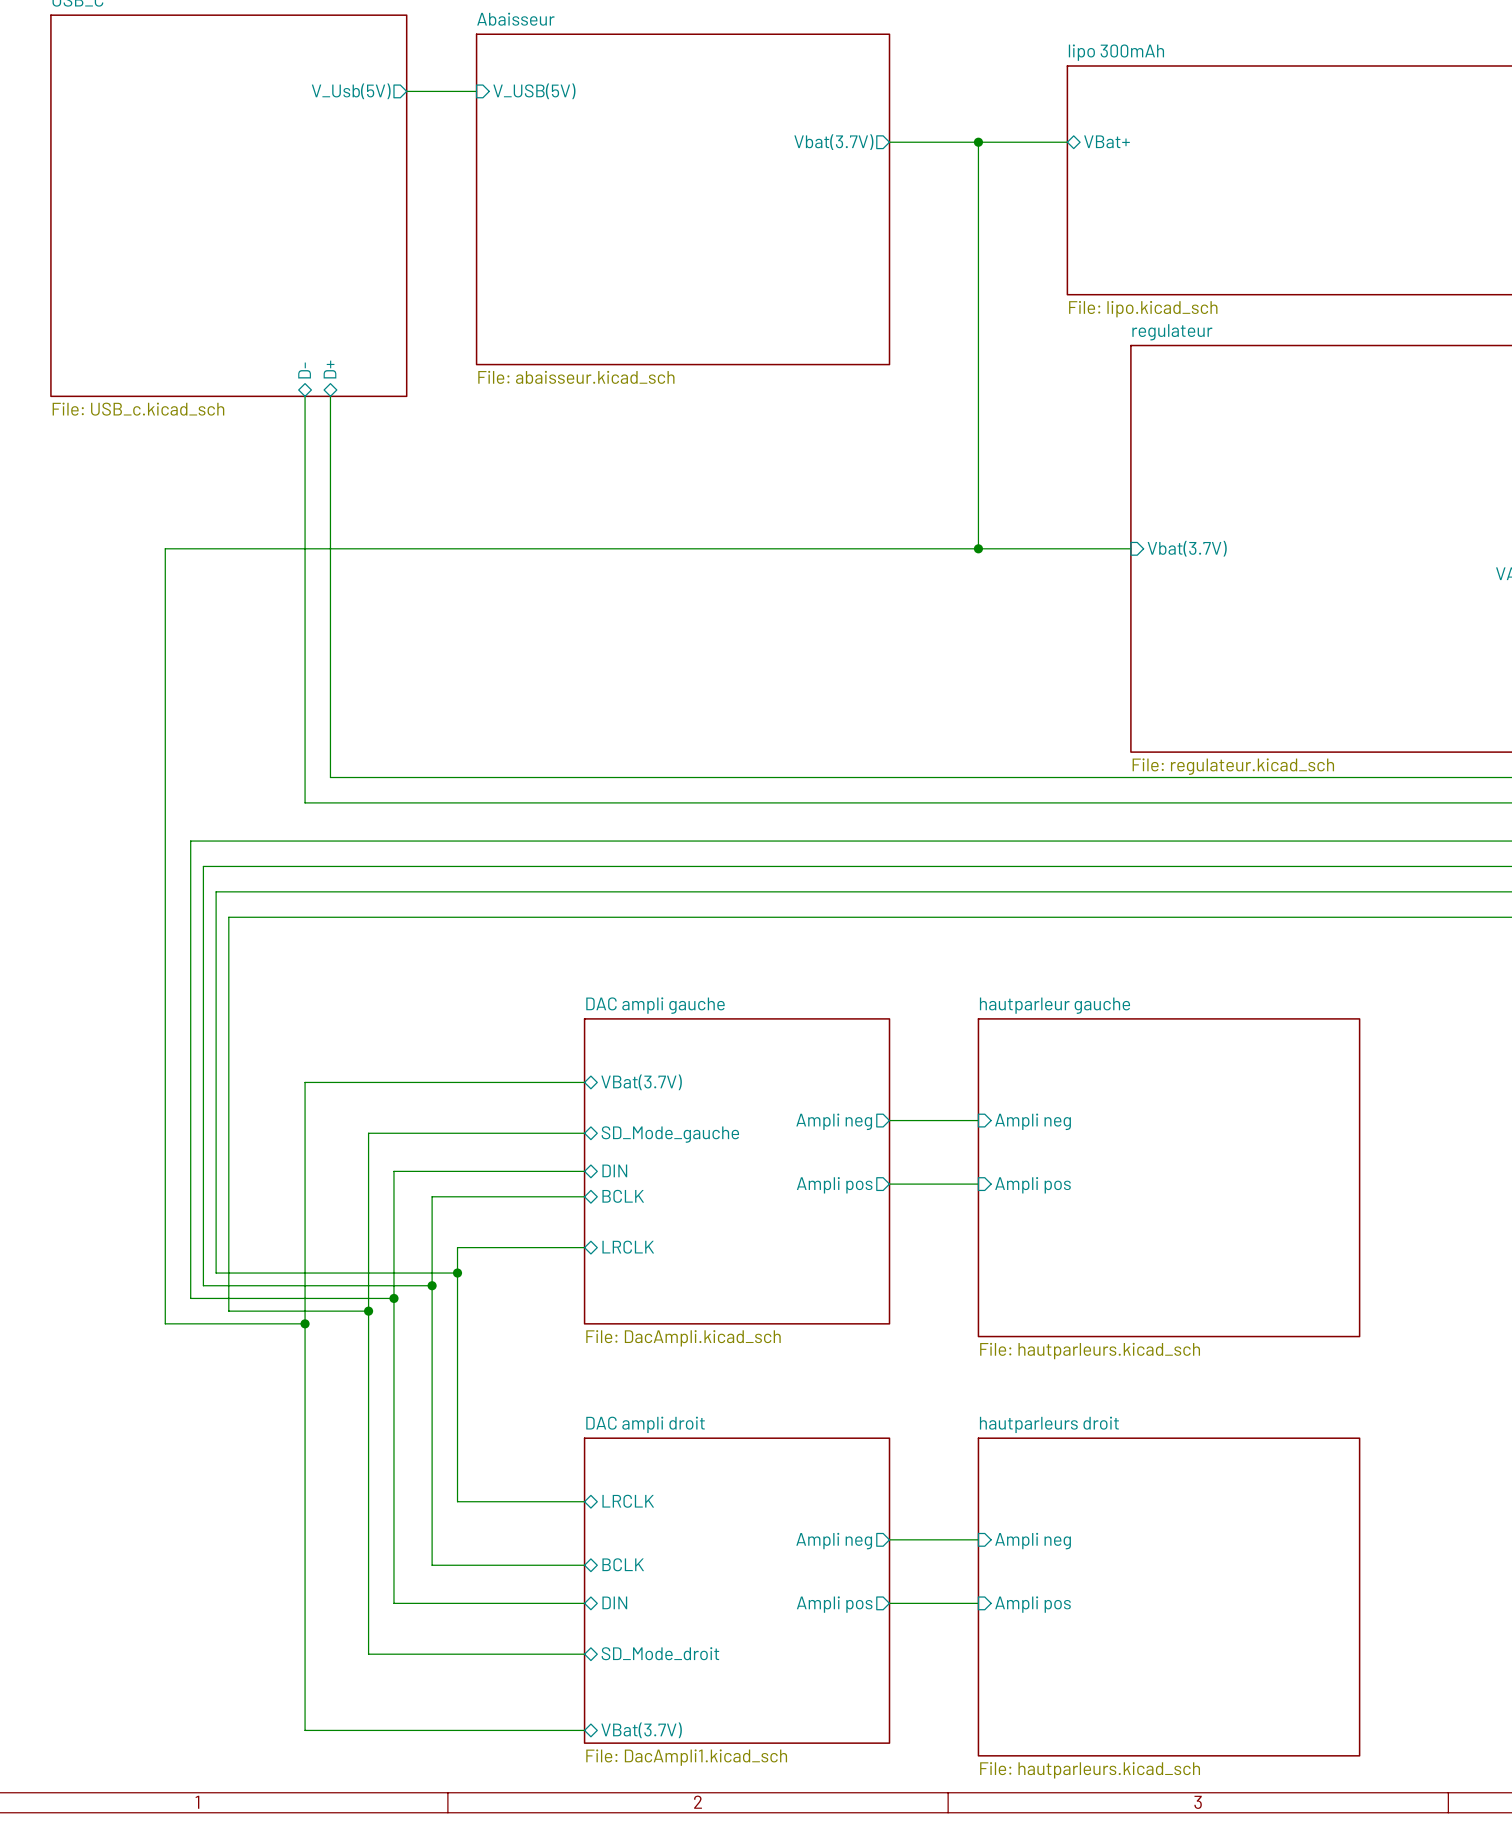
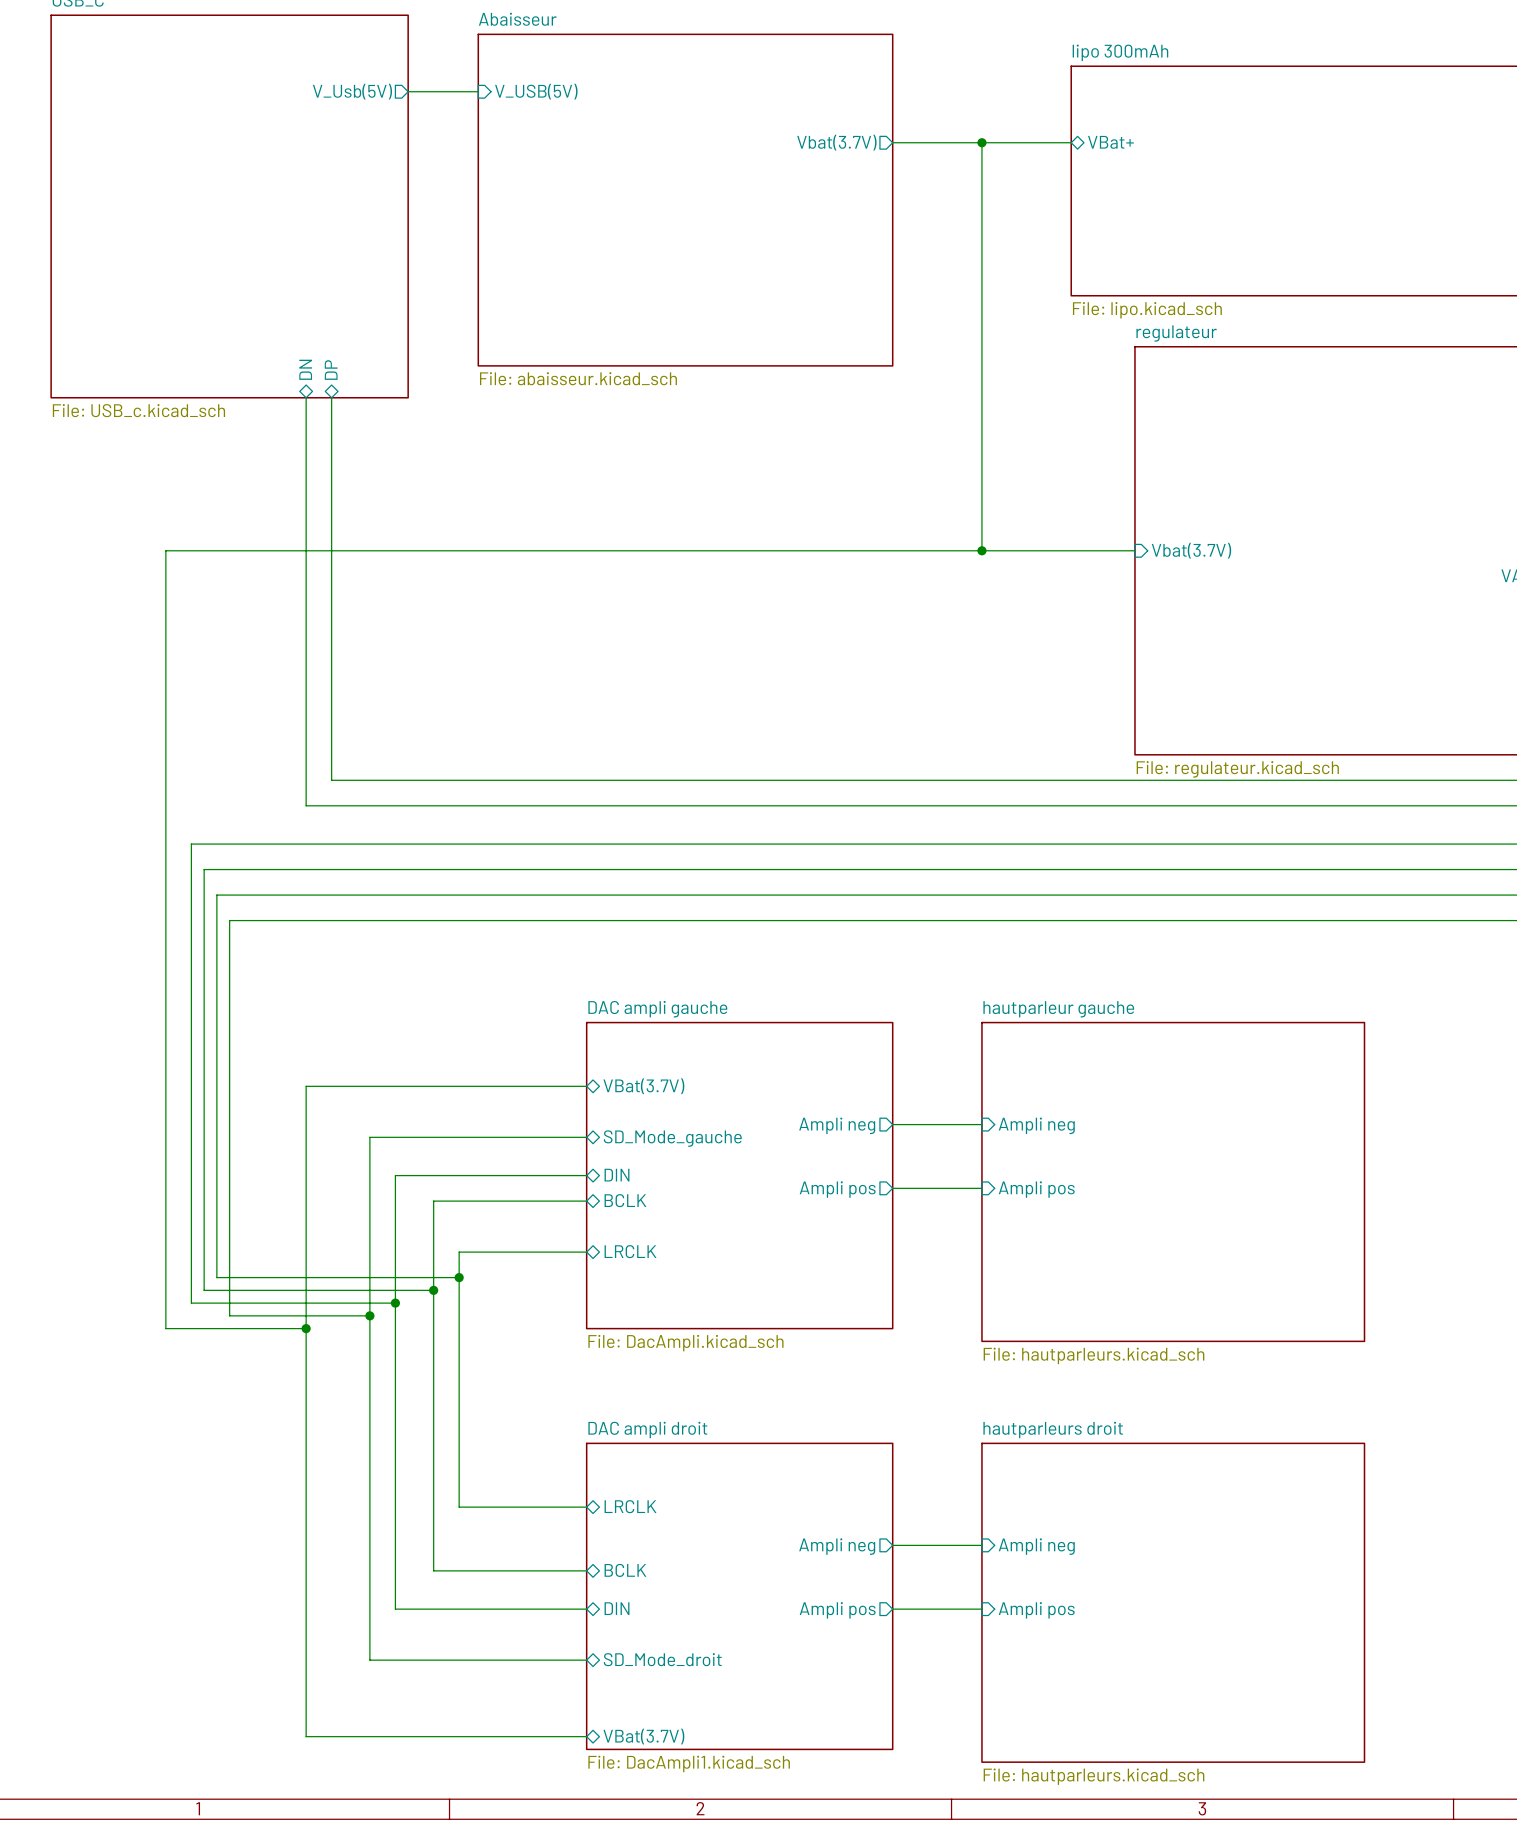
sheet pin: D+ (329, 369) -> DP (331, 370)
sheet pin: D- (304, 370) -> DN (305, 369)

